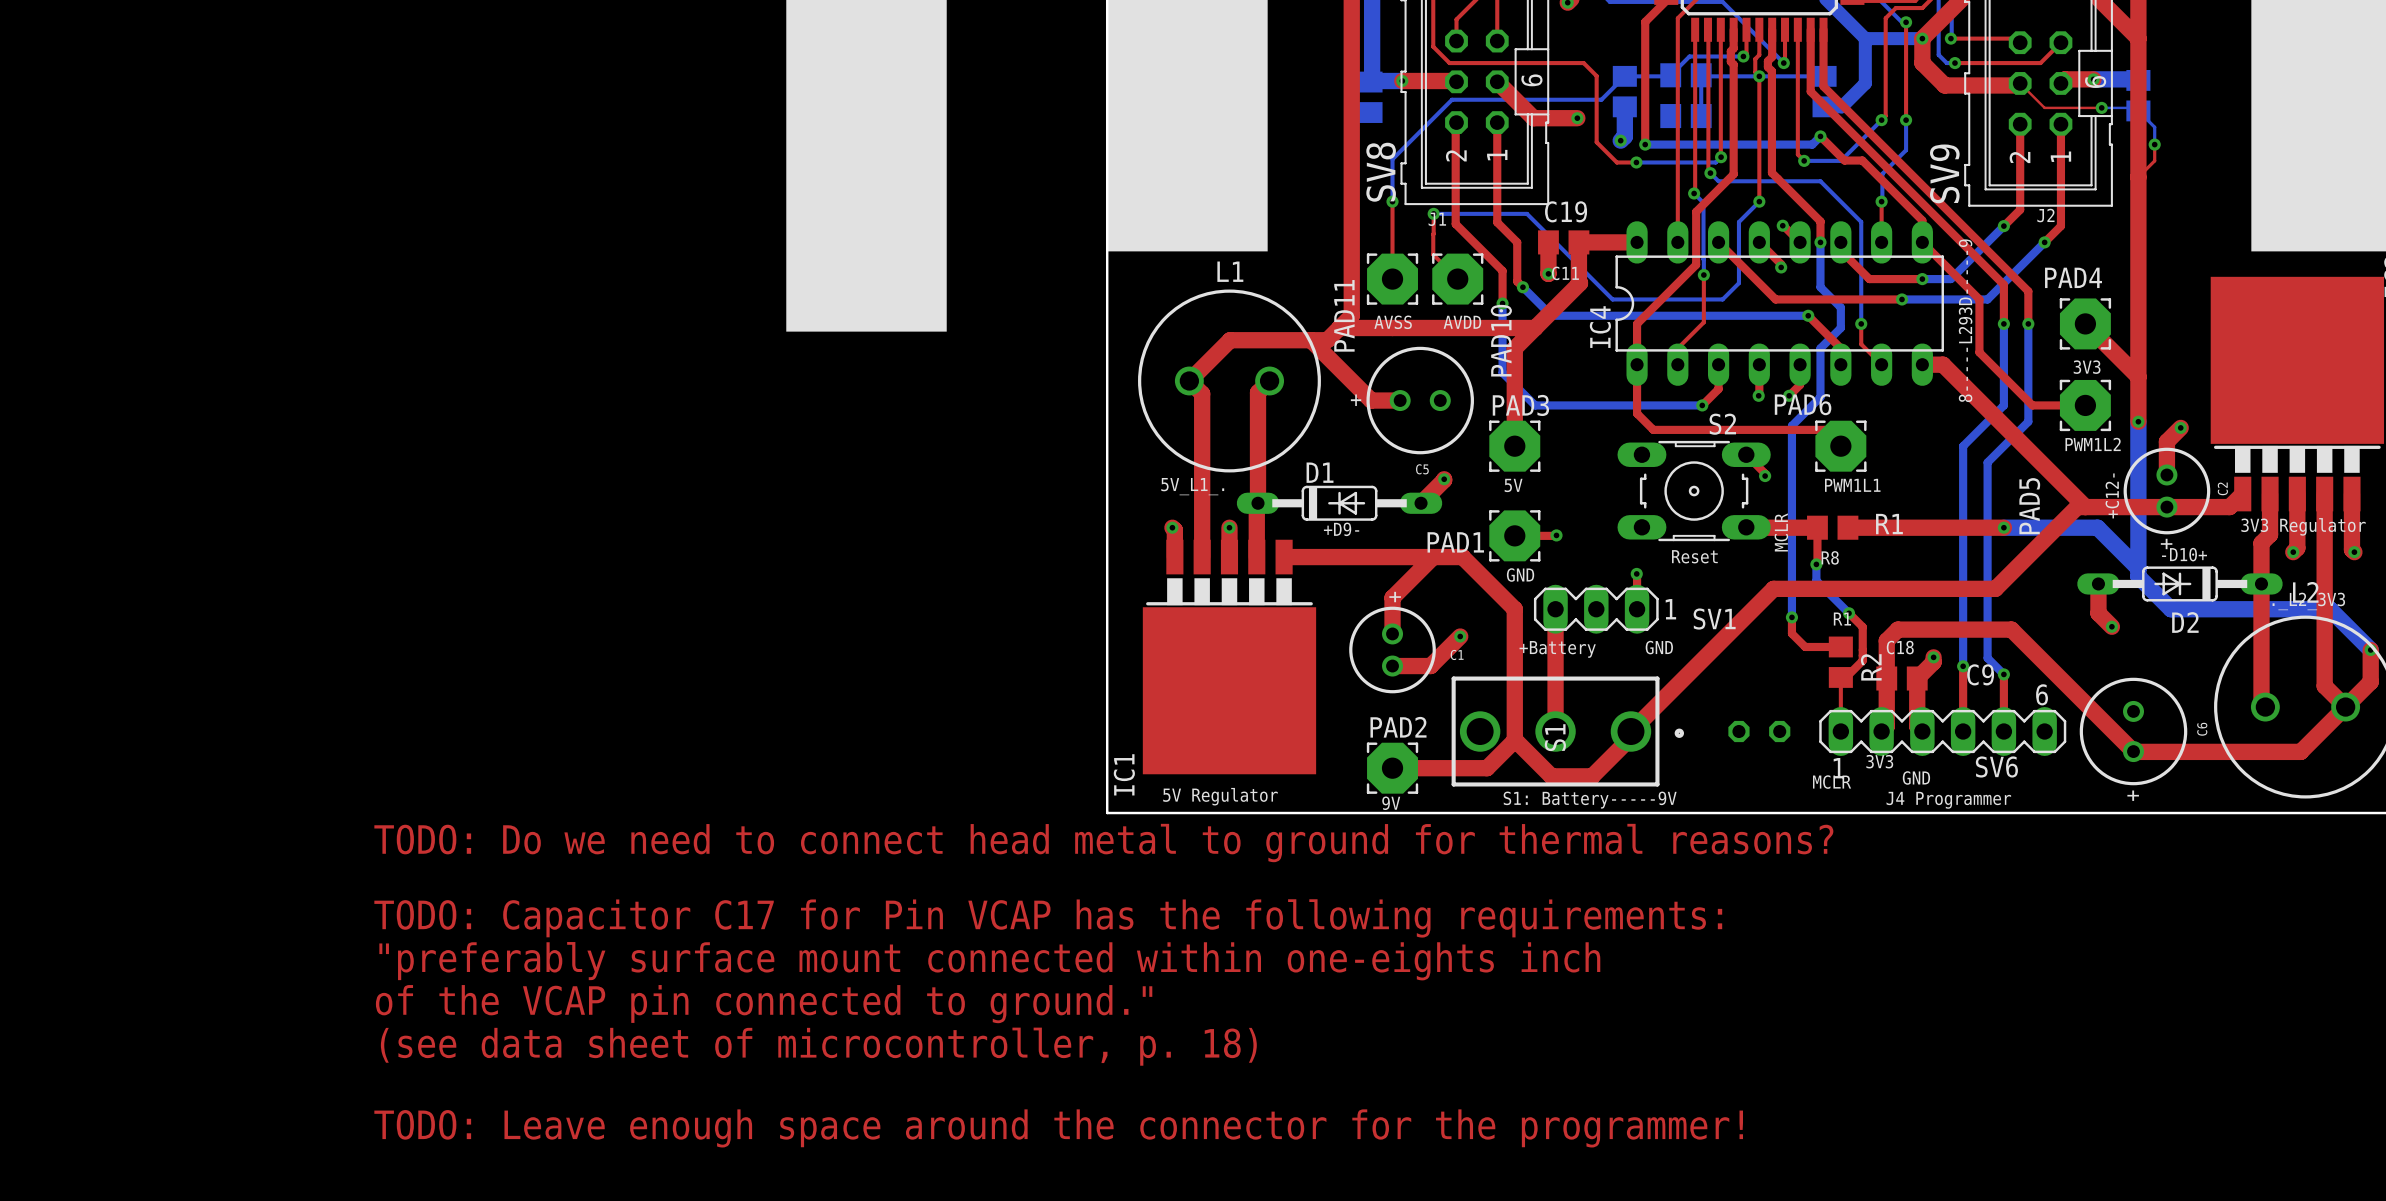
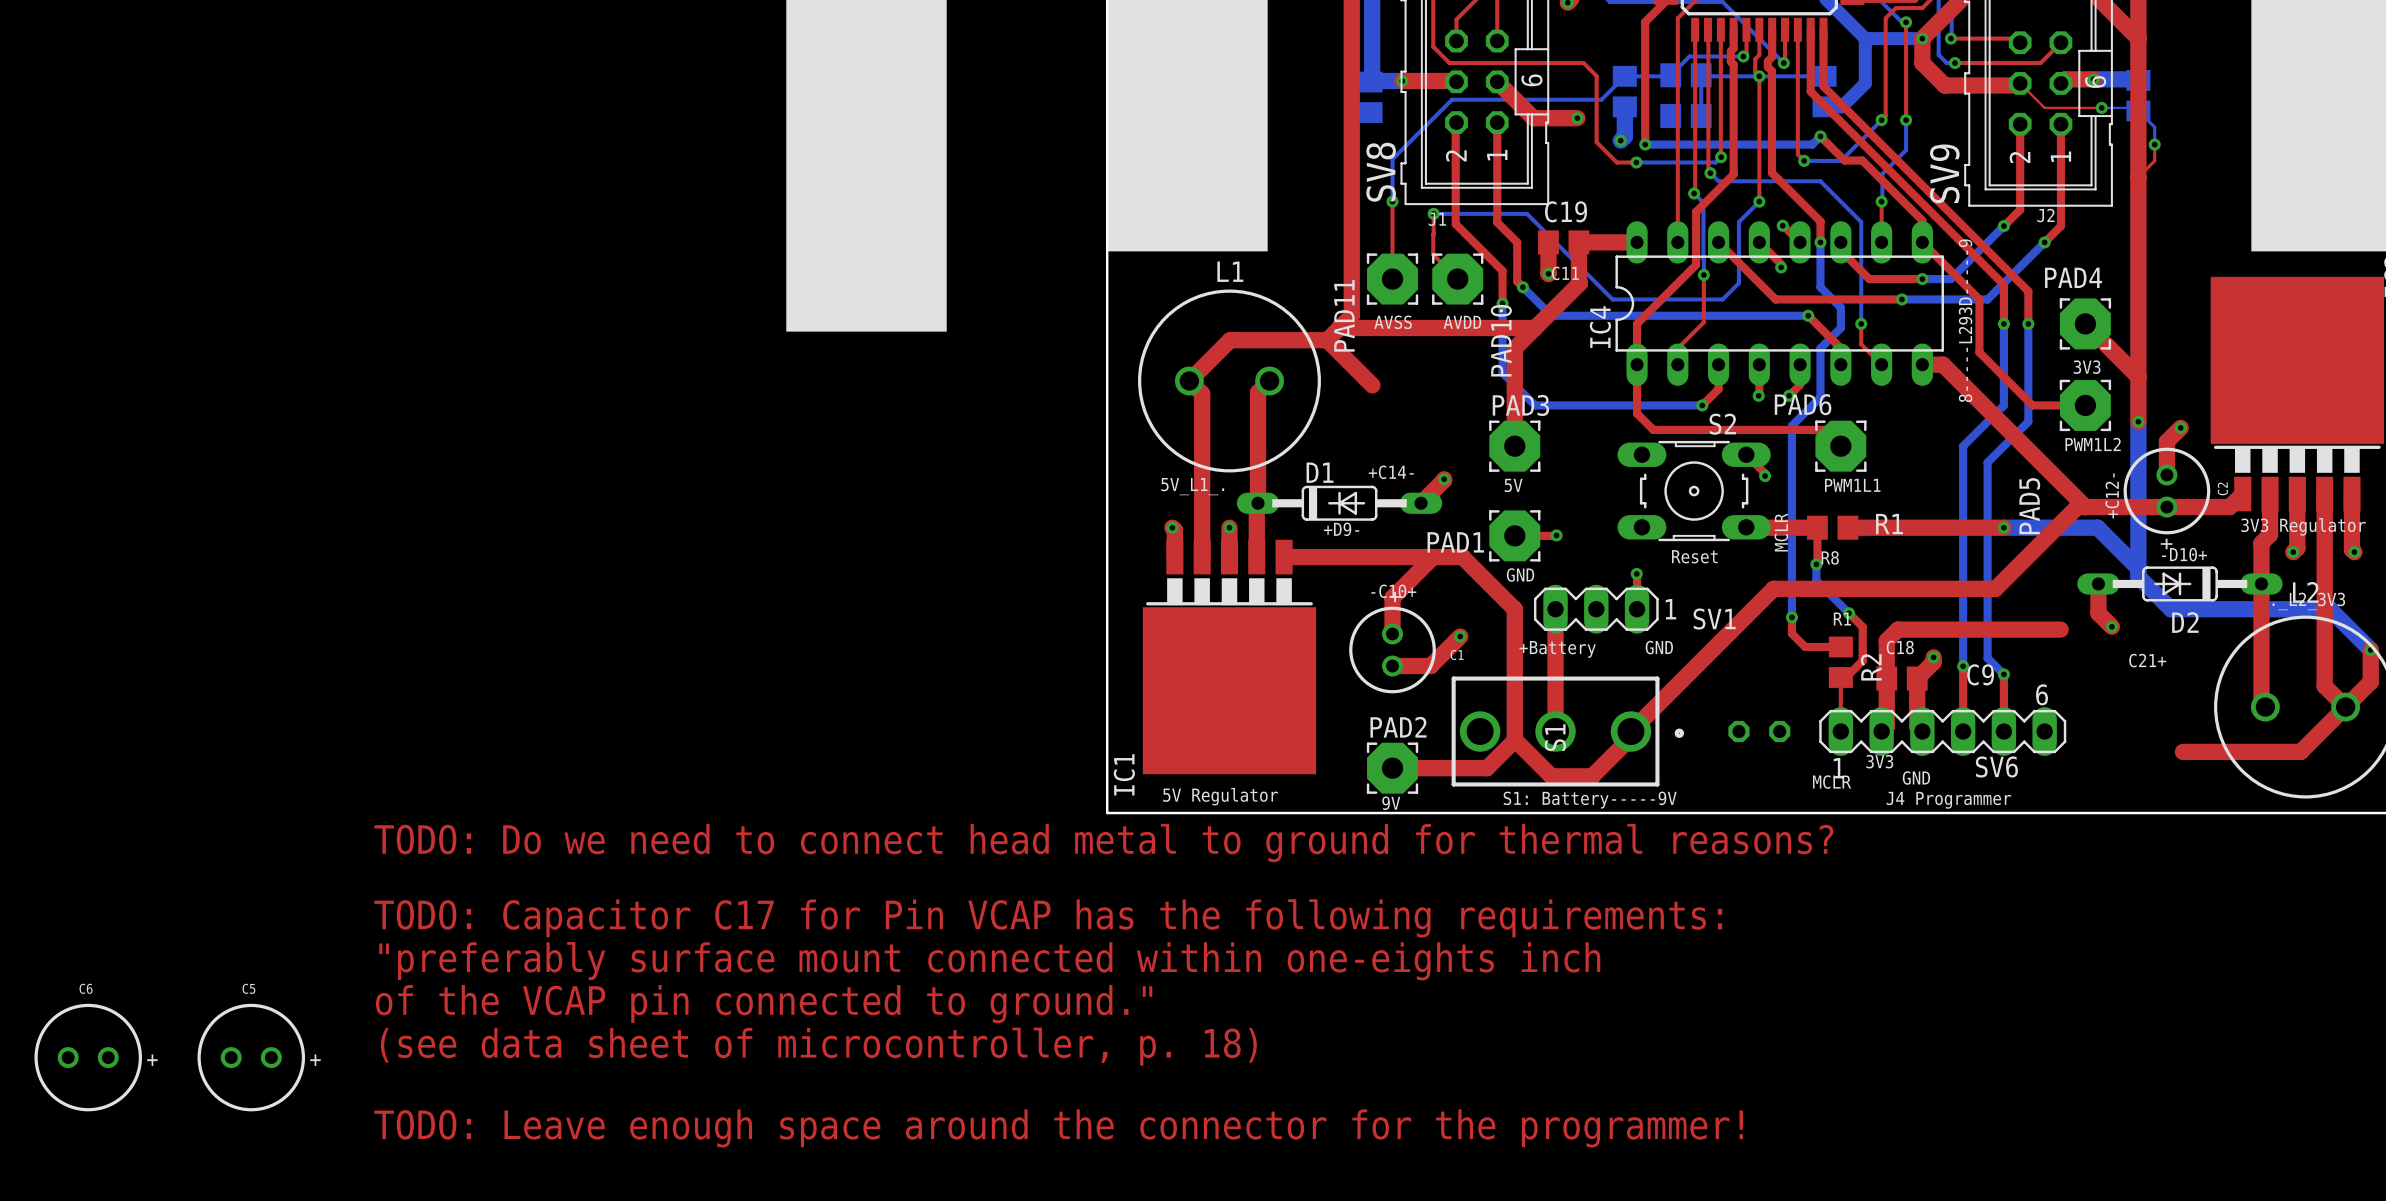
top track: (1310, 340) (1371, 400) (1400, 400) -> none
top track: none -> (1327, 340) (1372, 385)
C5 text position: + (1356, 400) -> + (315, 1060)
C5 position: (1420, 400) -> (251, 1057)
C5 name position: C5 (1422, 469) -> C5 (248, 988)
text: none -> +C14- (1391, 472)
text: none -> -C10+ (1393, 591)
top track: (2011, 629) (2133, 751) (2182, 751) -> (2011, 629) (2060, 629)
text: none -> C21+ (2147, 660)
C6 footprint: [2079, 677, 2188, 786] -> [34, 1003, 142, 1112]
C6 name position: C6 (2202, 729) -> C6 (86, 988)

